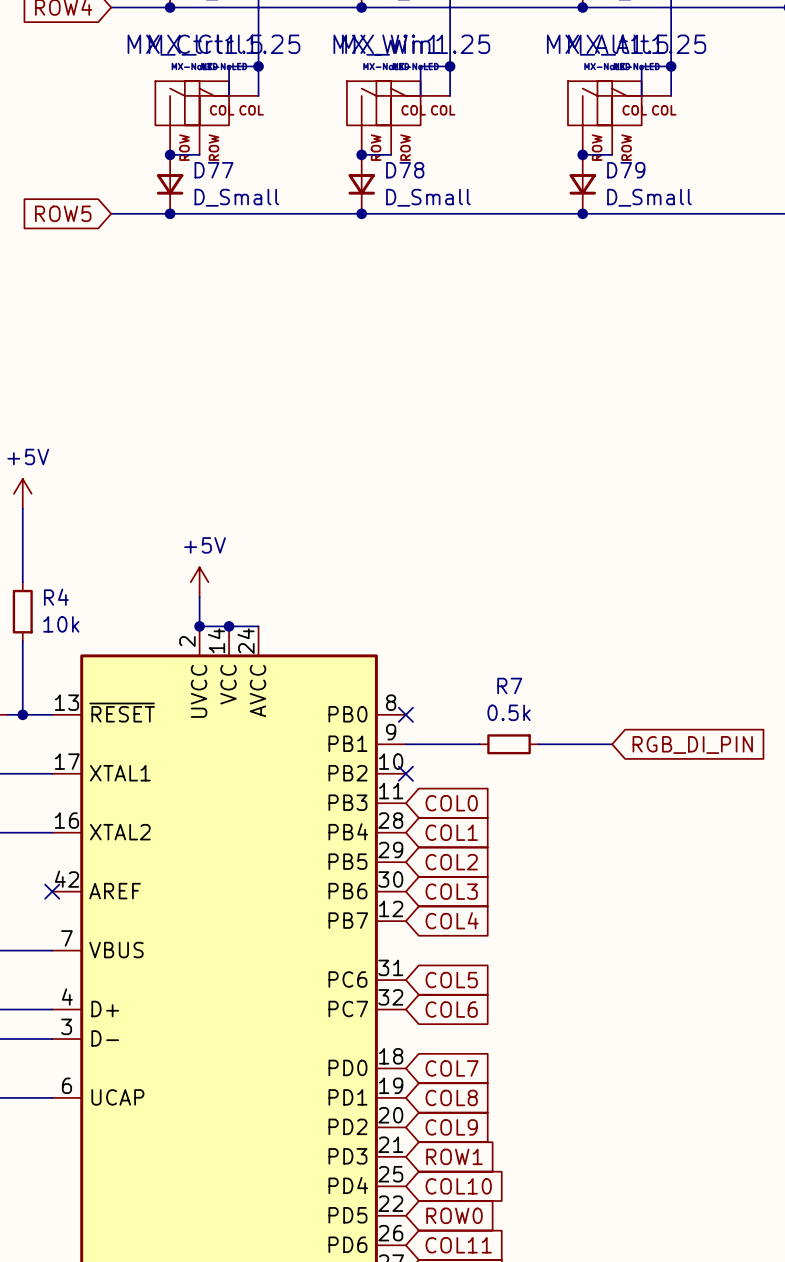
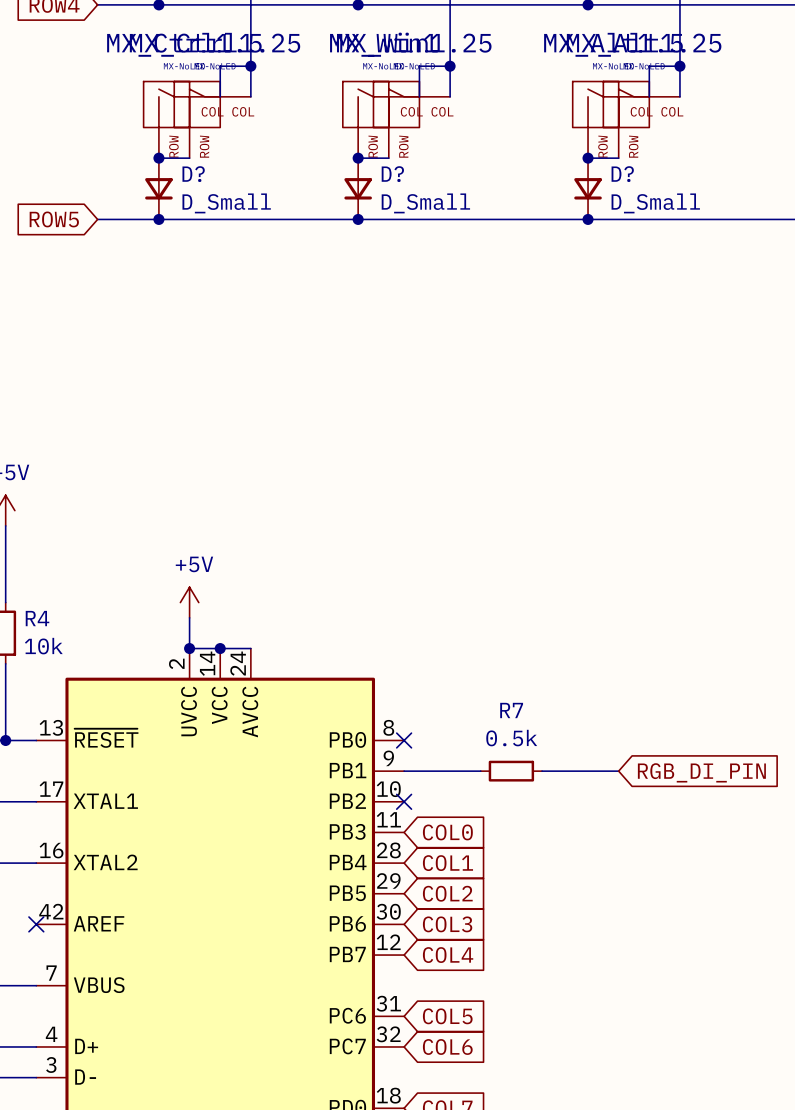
D77 name: D77 (214, 170) -> D? (193, 174)
D78 name: D78 (405, 170) -> D? (392, 174)
D79 name: D79 (626, 170) -> D? (622, 174)

